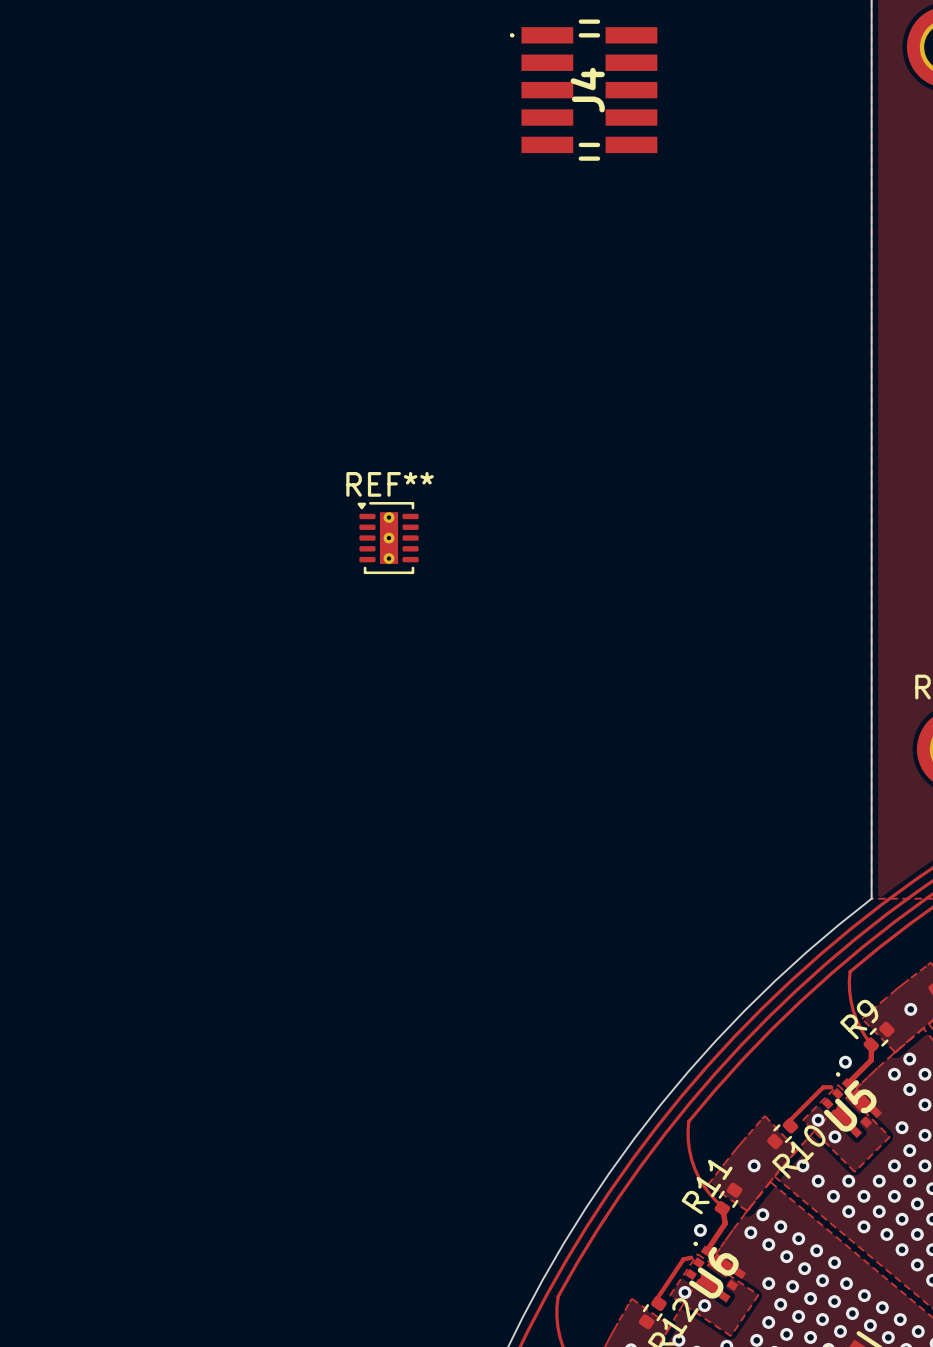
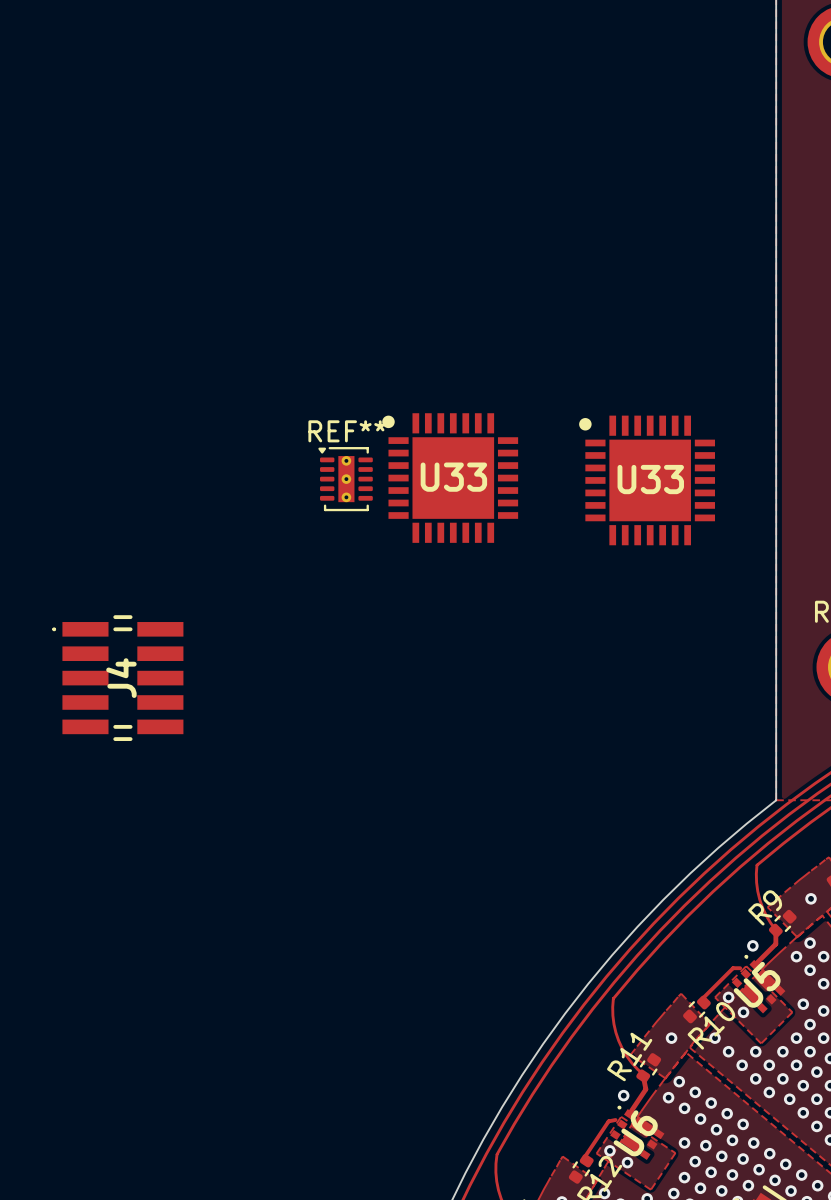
J4 position: (583, 90) -> (117, 678)
U33: none -> (450, 478)
U33: none -> (647, 480)

